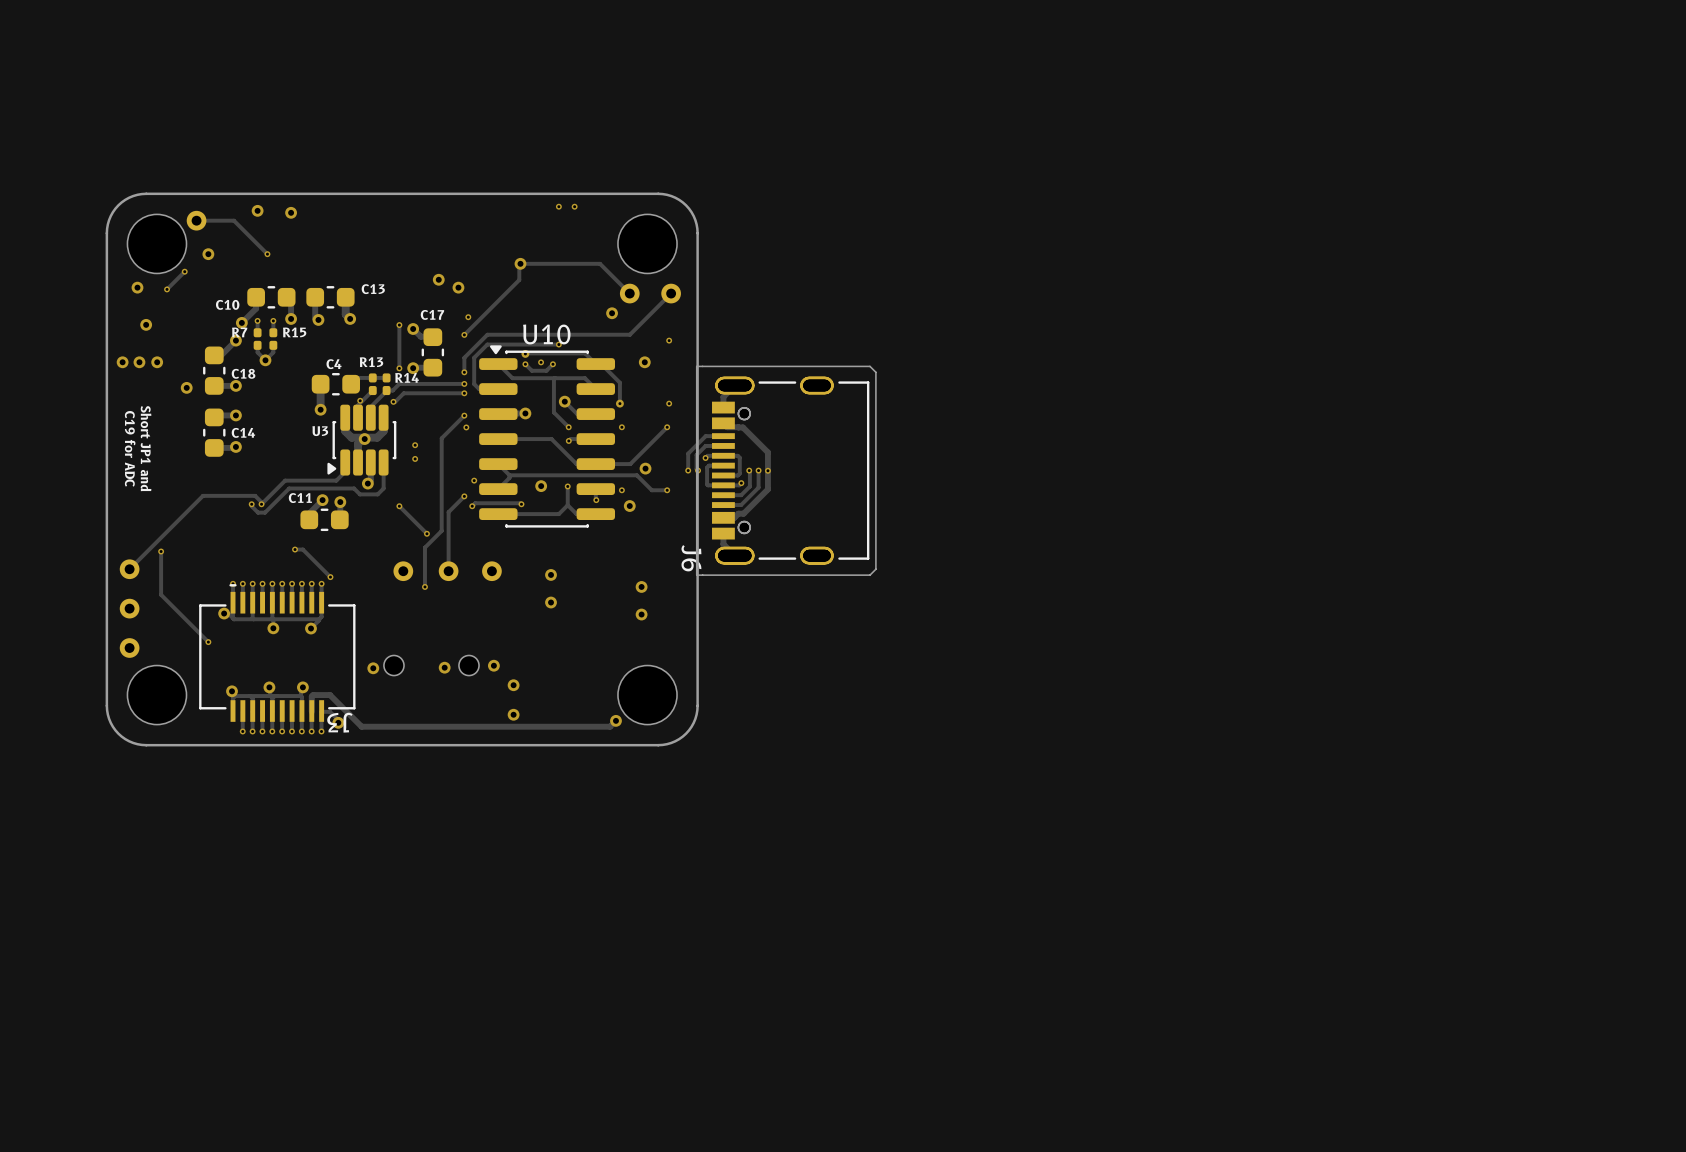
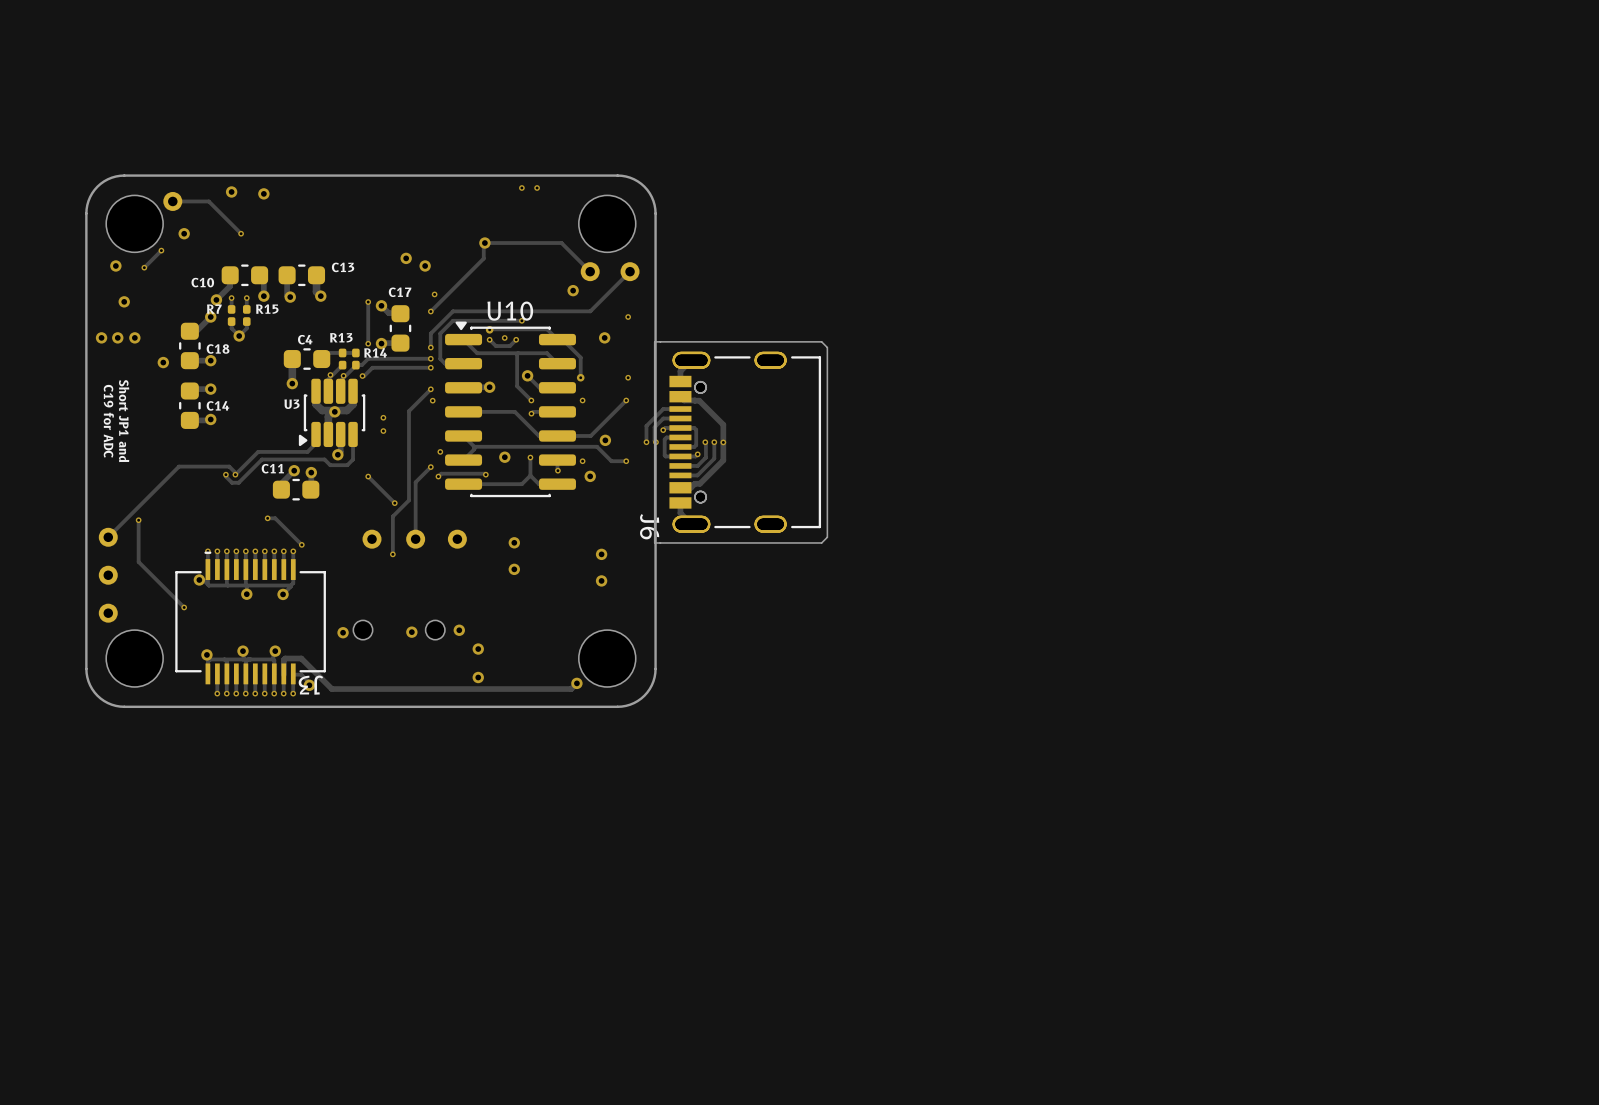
via: none -> (343, 375)

